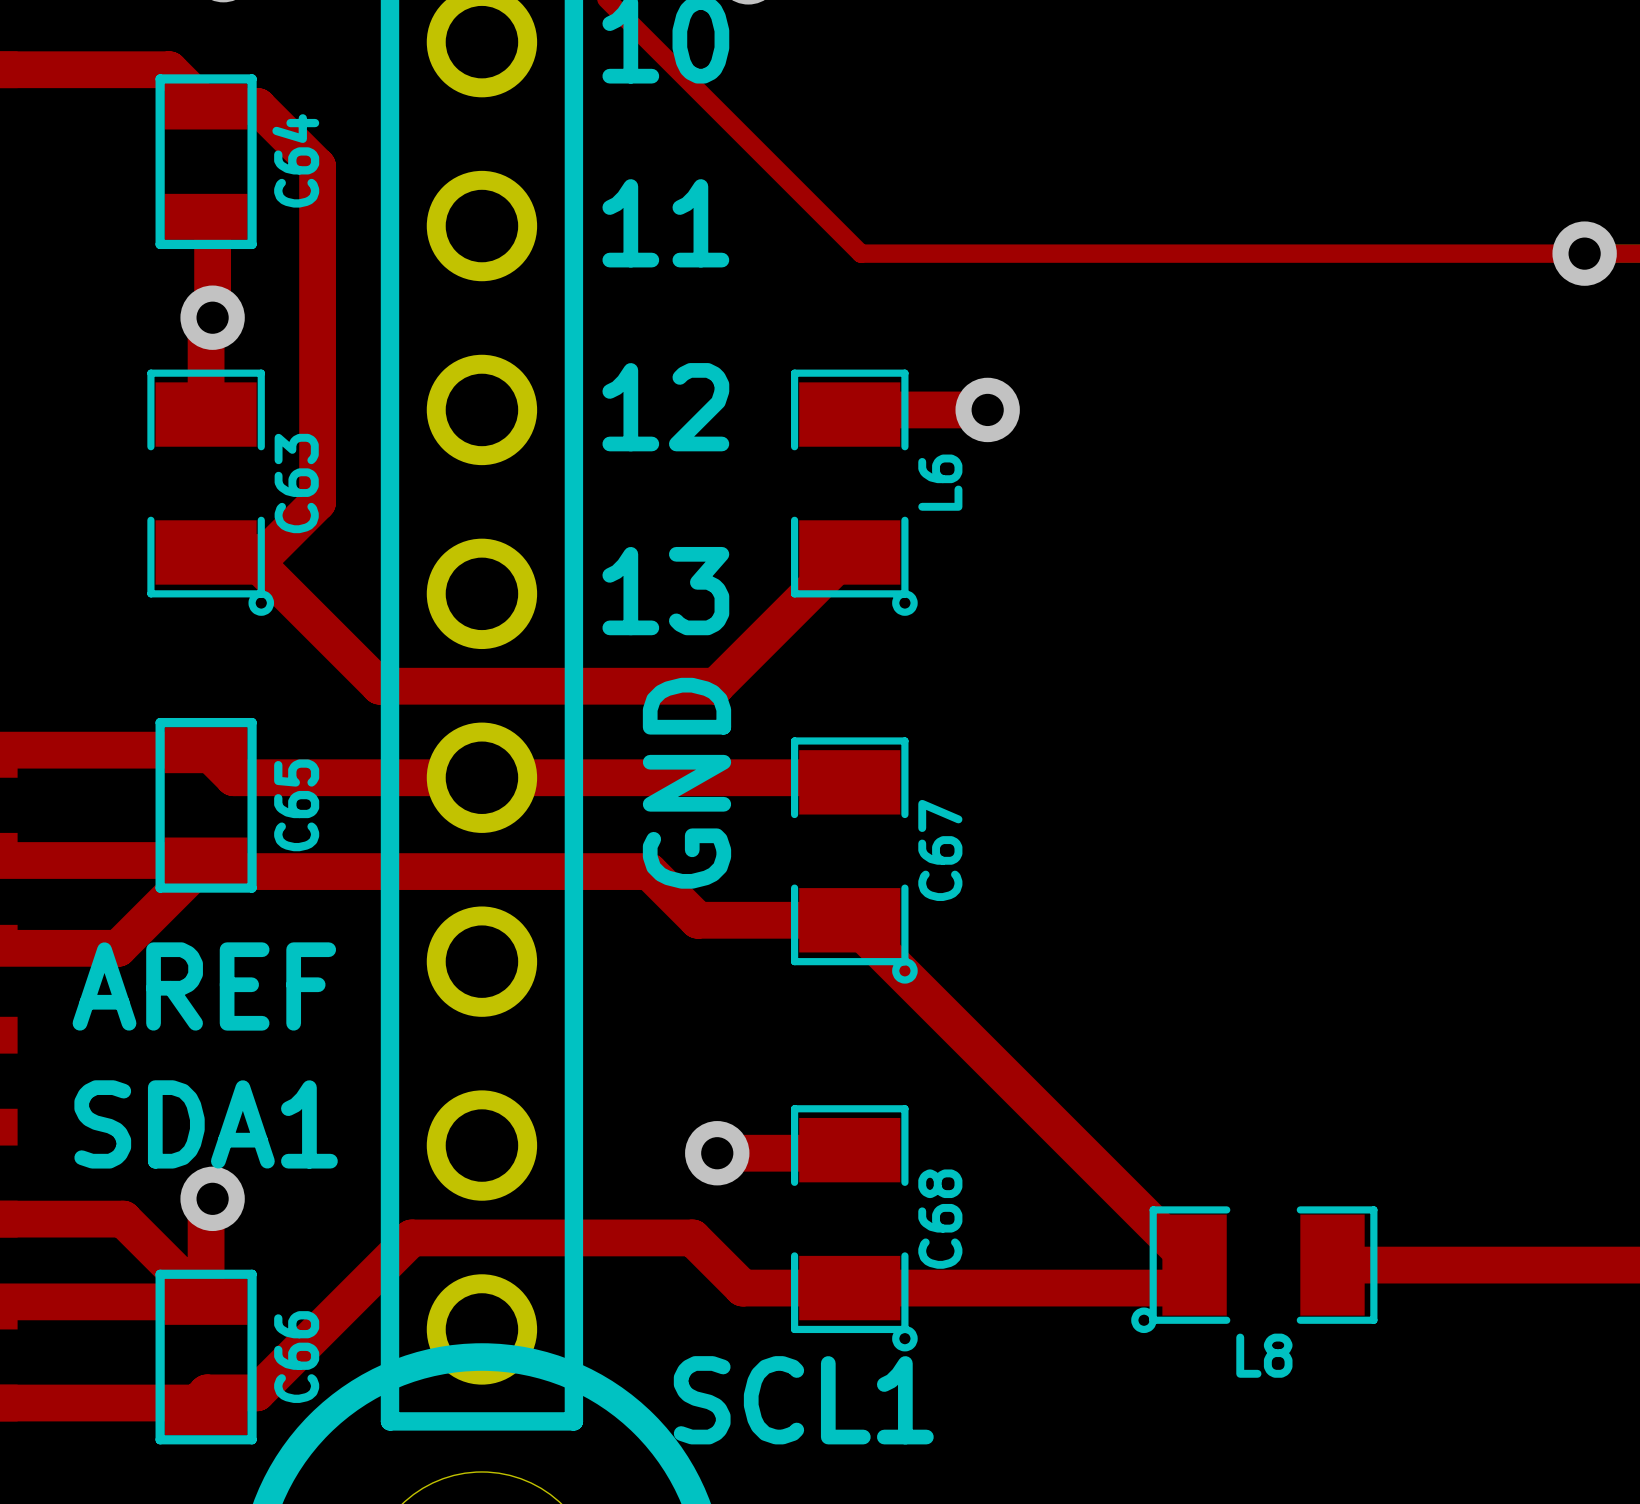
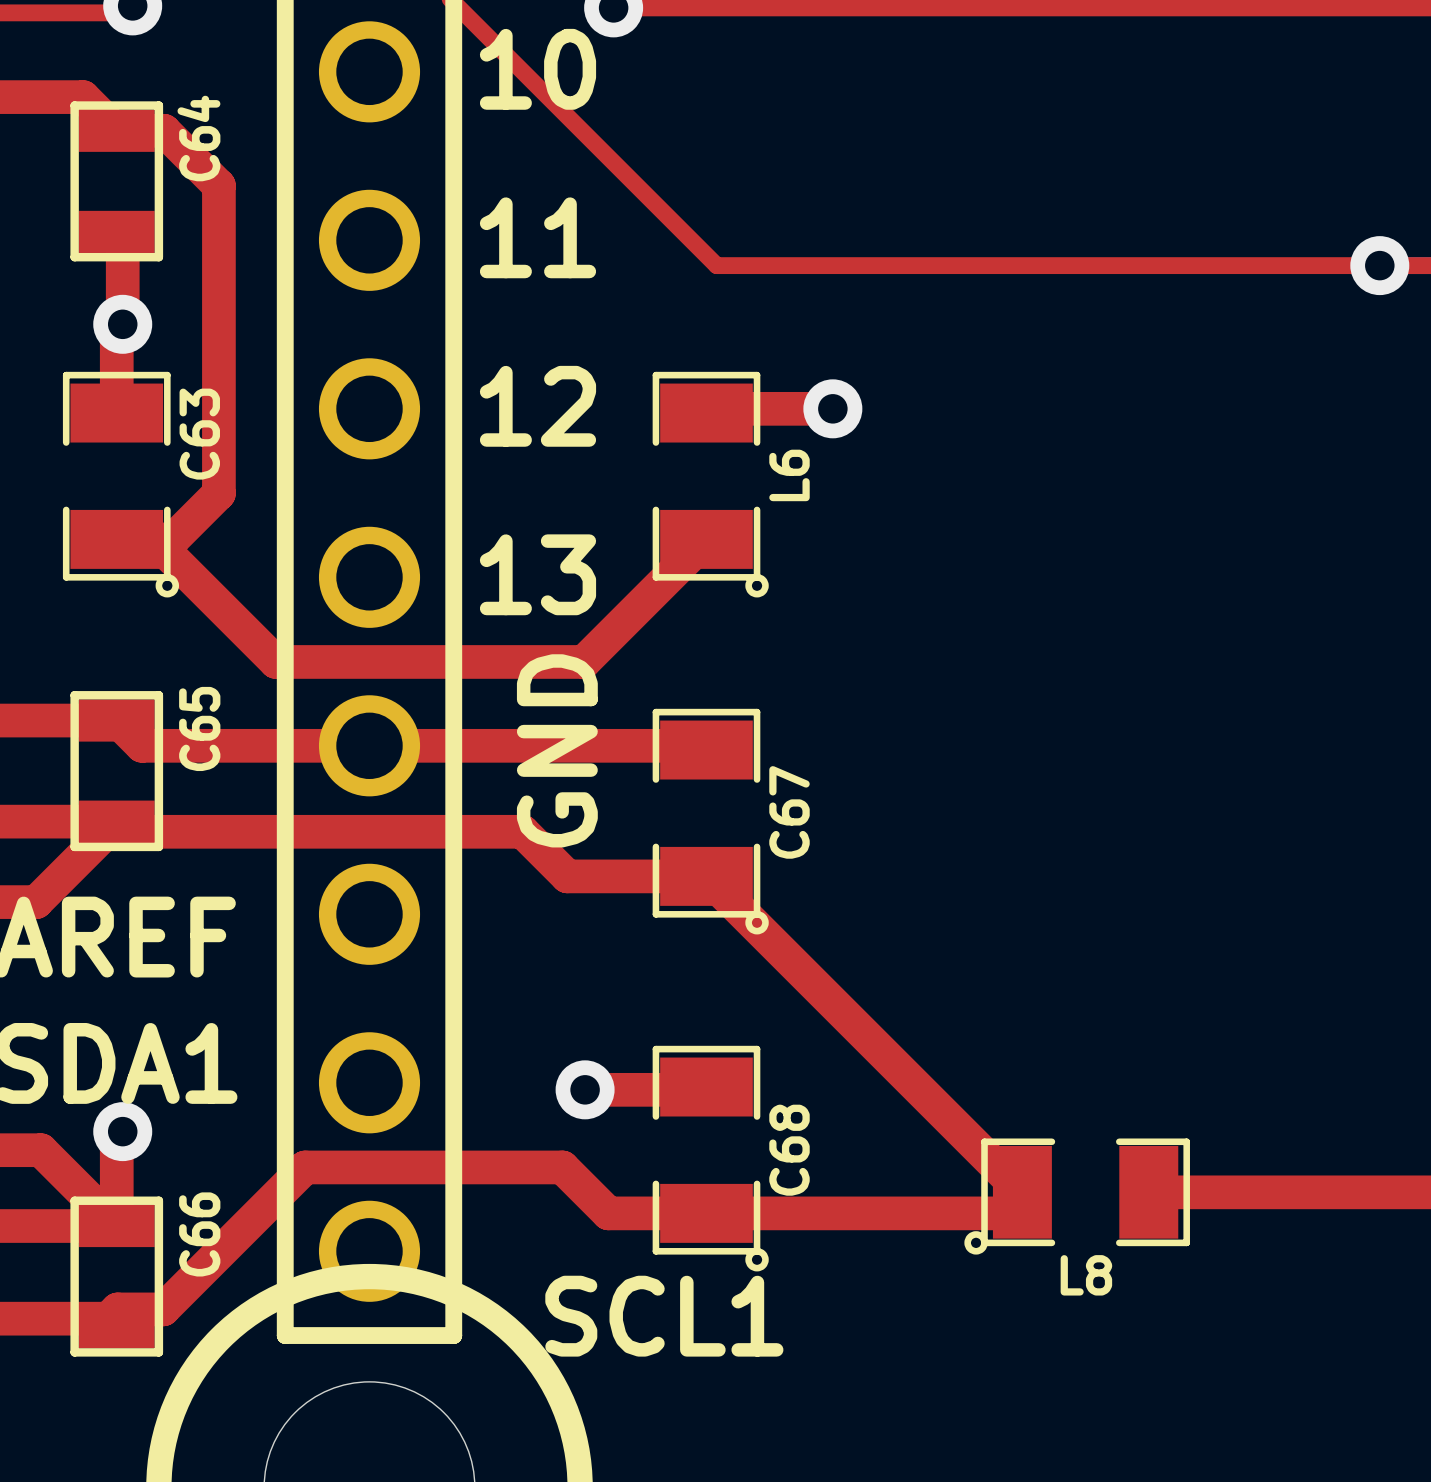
C64 name position: C64 (295, 160) -> C64 (198, 138)
C63 name position: C63 (296, 483) -> C63 (199, 434)
C65 name position: C65 (296, 805) -> C65 (199, 728)
C66 name position: C66 (296, 1357) -> C66 (199, 1234)

